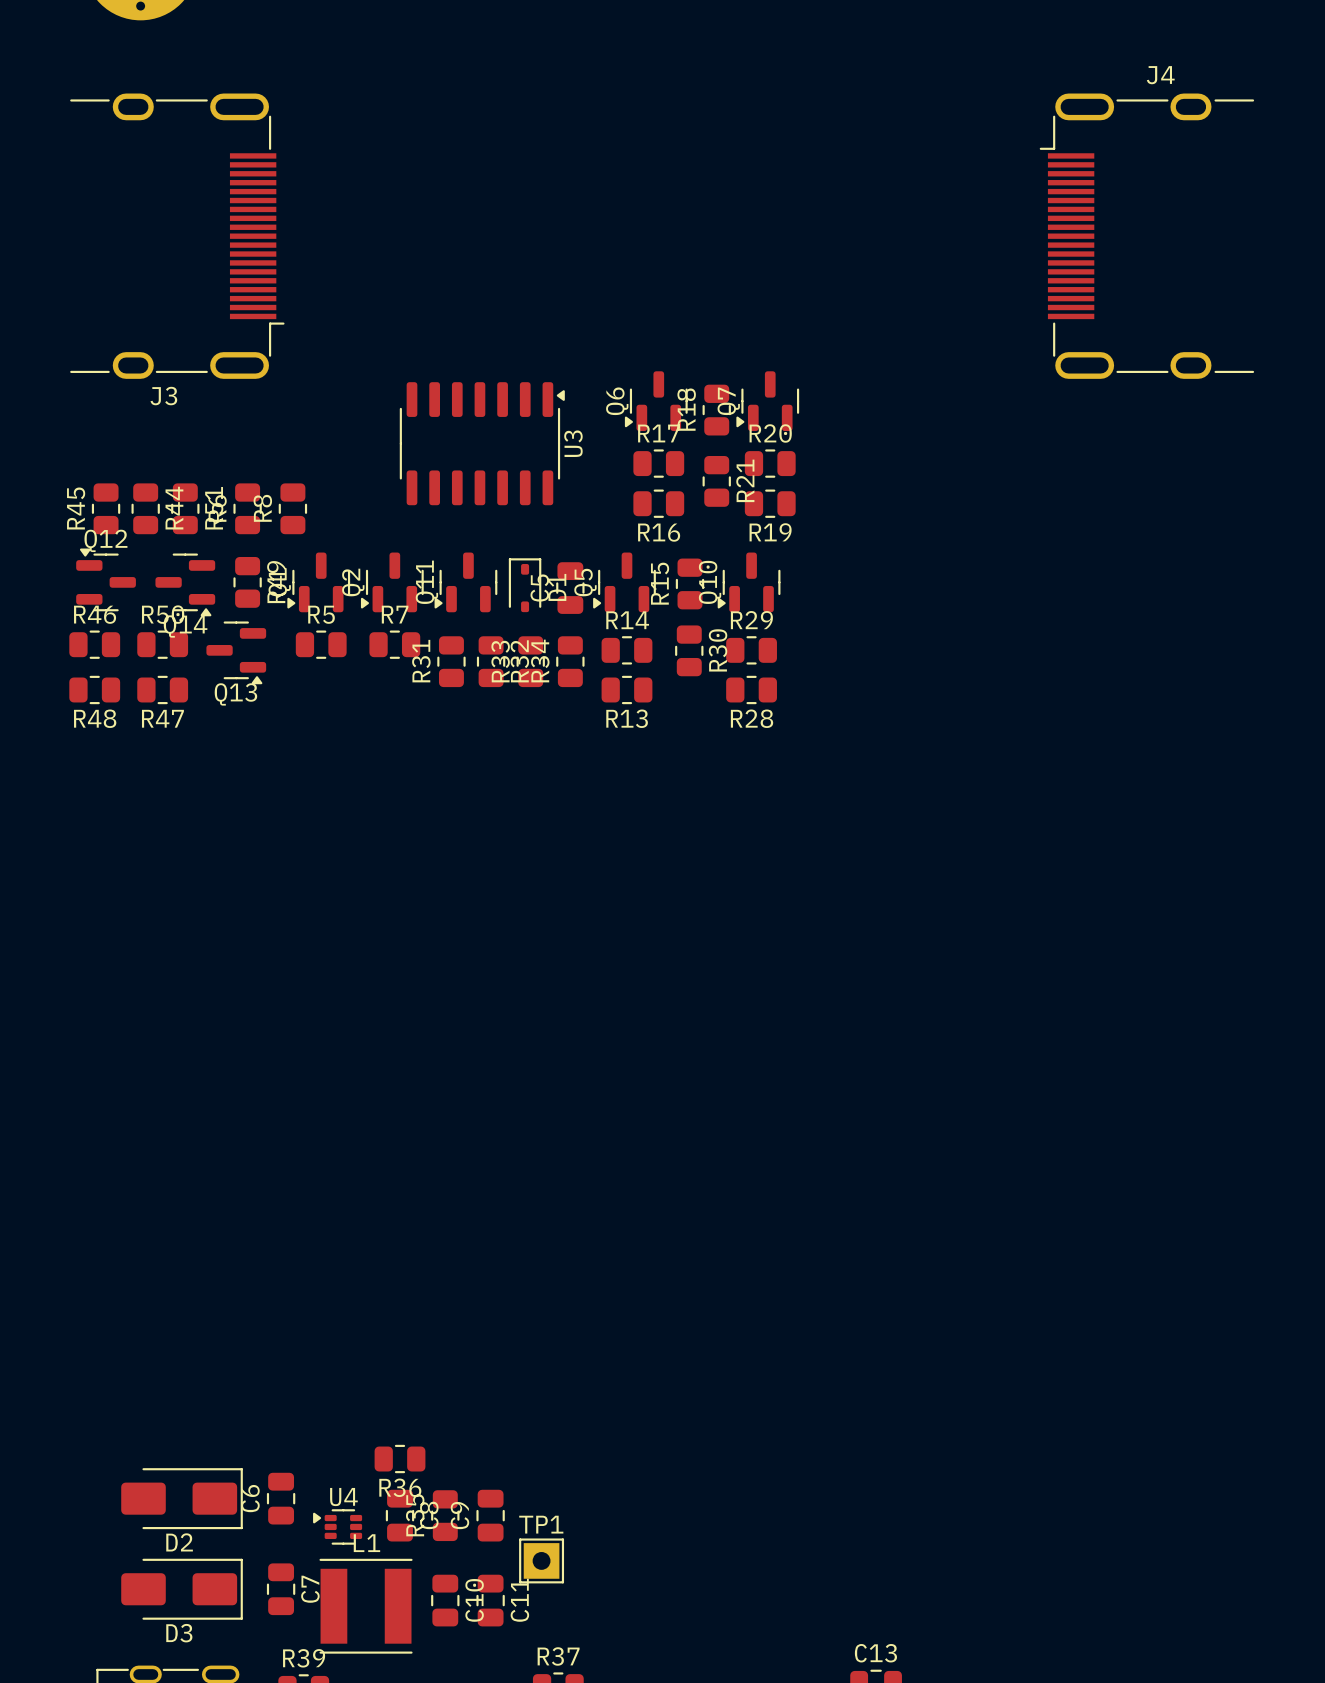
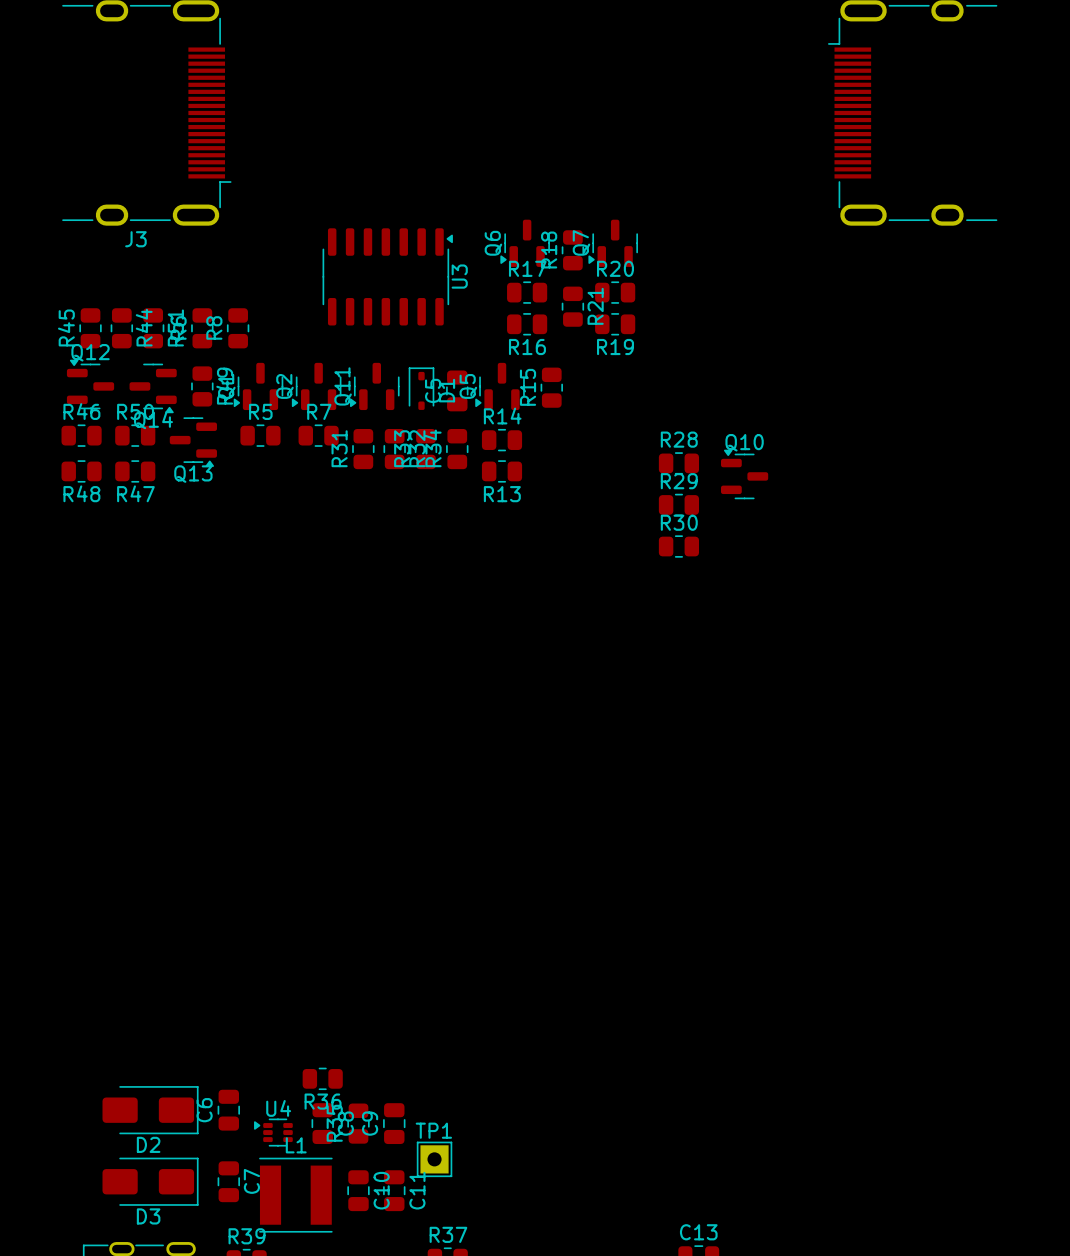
Q10 rotation: 0° (749, 582) -> 90° clockwise (744, 474)
Q10 position: (749, 582) -> (744, 474)
R30 rotation: 0° (689, 650) -> 90° clockwise (678, 546)
R30 position: (689, 650) -> (678, 546)
R30 name position: R30 (718, 650) -> R30 (679, 522)
R29 position: (751, 650) -> (678, 504)
R28 position: (751, 689) -> (678, 463)
R28 name position: R28 (752, 718) -> R28 (679, 439)

